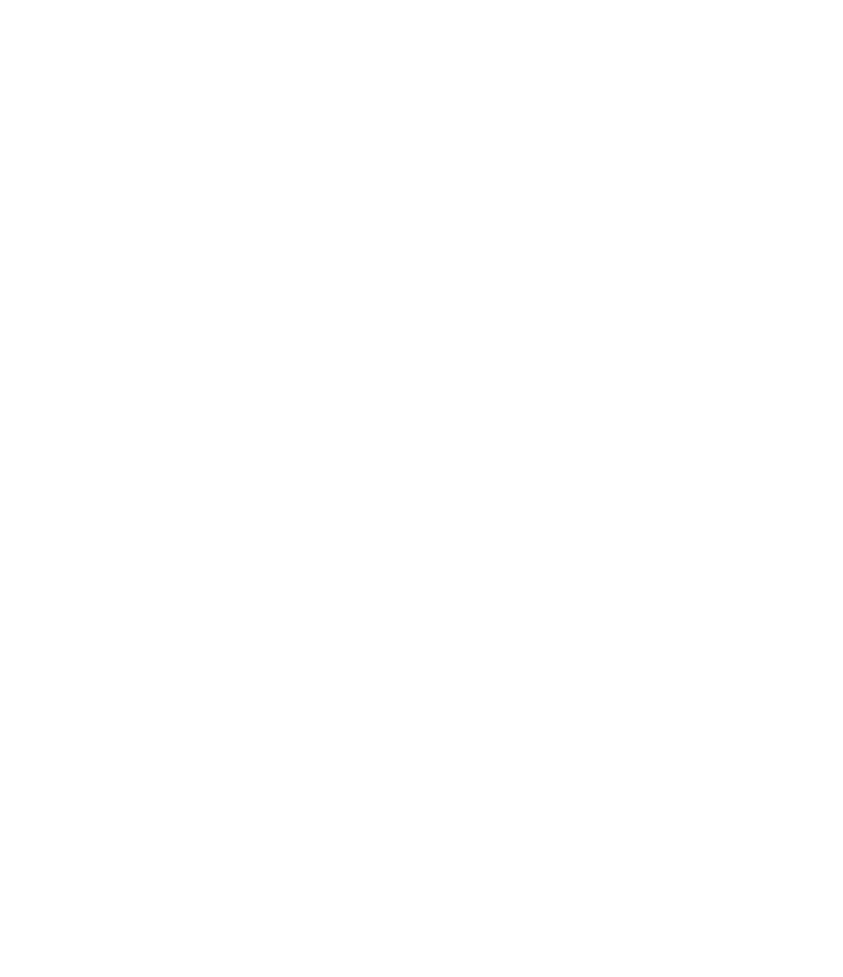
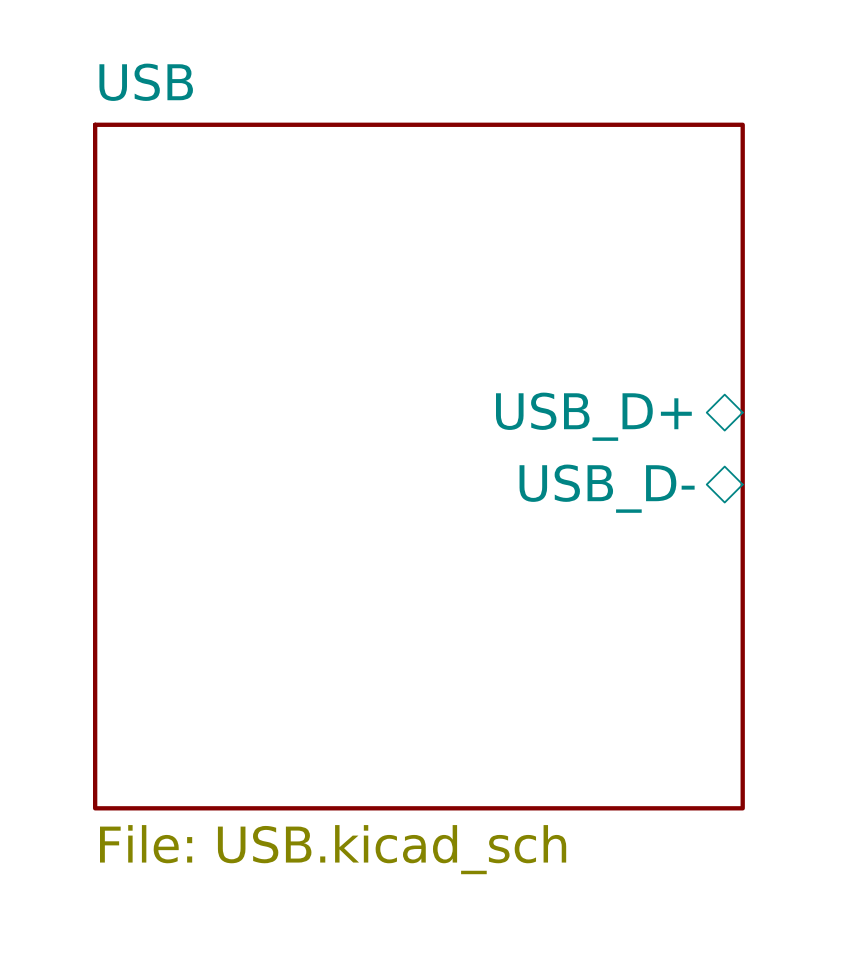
sheet pin: none -> USB_D+ (593, 416)
sheet USB: none -> File: USB.kicad_sch (418, 466)
sheet pin: none -> USB_D- (607, 488)

